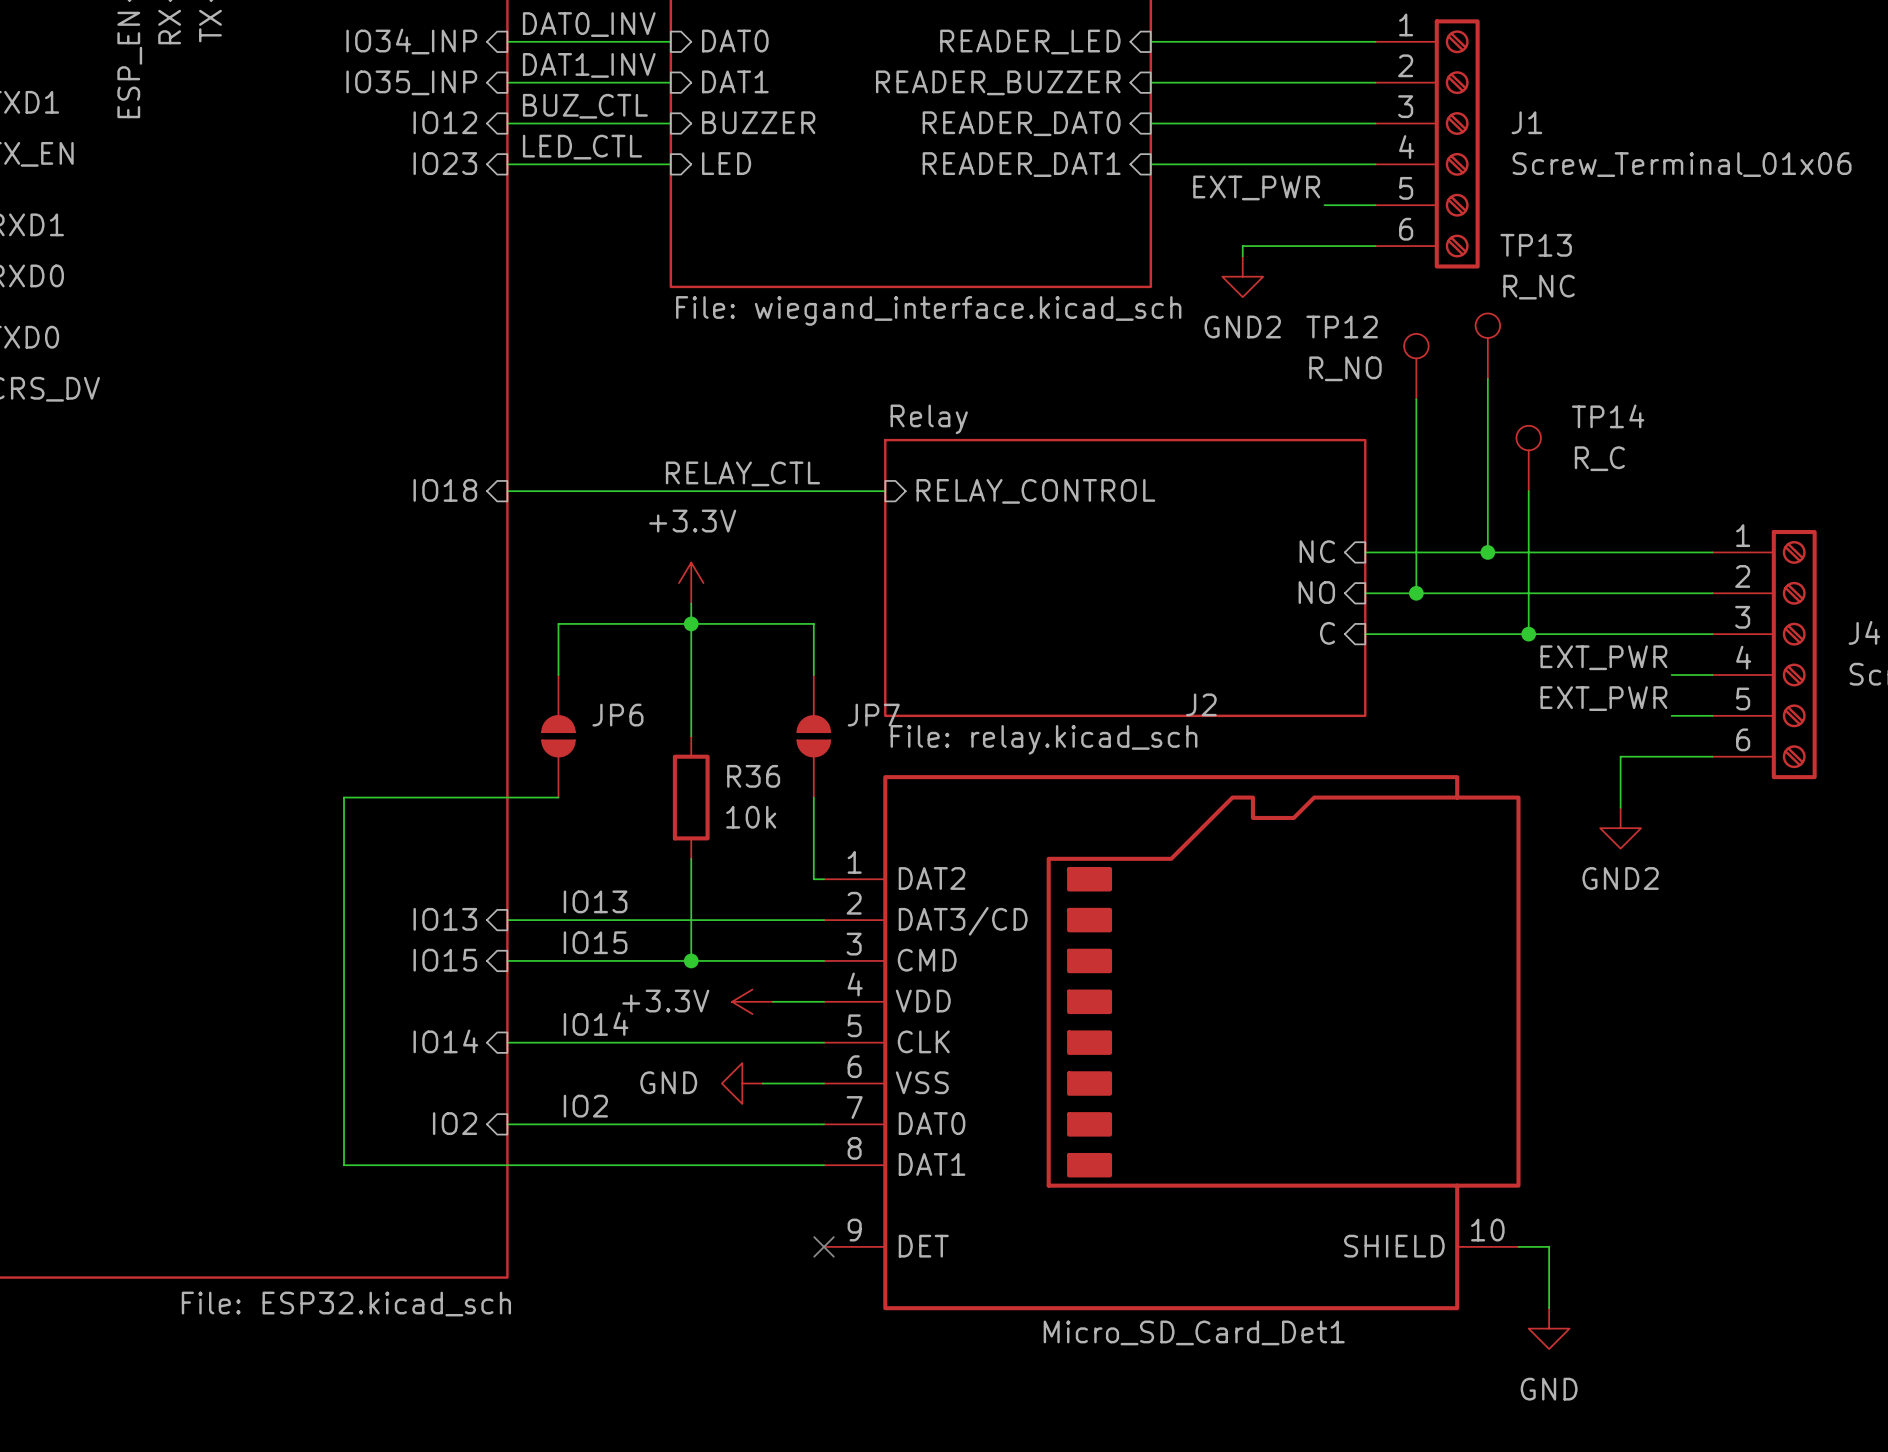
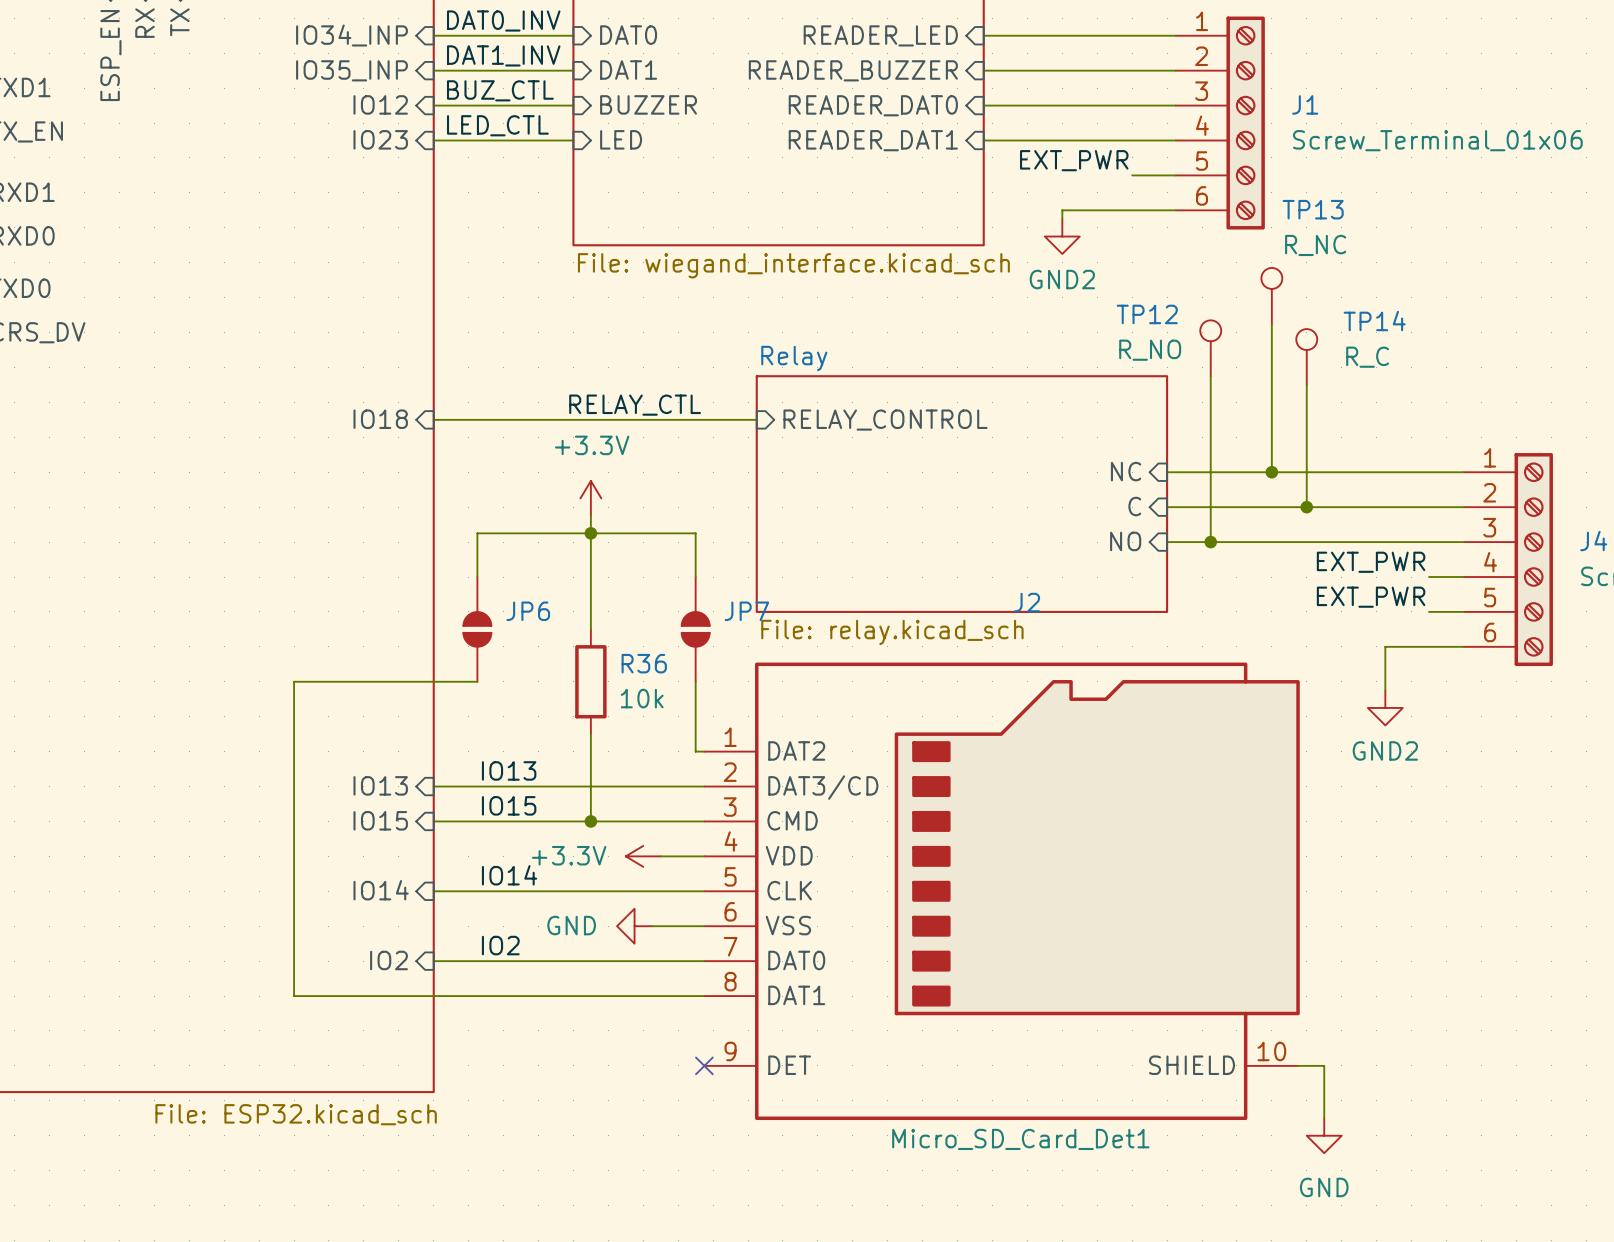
TP12 position: (1416, 366) -> (1210, 348)
TP14 position: (1528, 458) -> (1306, 357)
sheet pin: NO (1316, 592) -> C (1134, 506)
junction position: (1416, 593) -> (1210, 542)
wire: (1528, 593) (1528, 634) -> (1210, 507) (1210, 542)
sheet pin: C (1327, 633) -> NO (1125, 541)
junction position: (1528, 634) -> (1306, 507)

